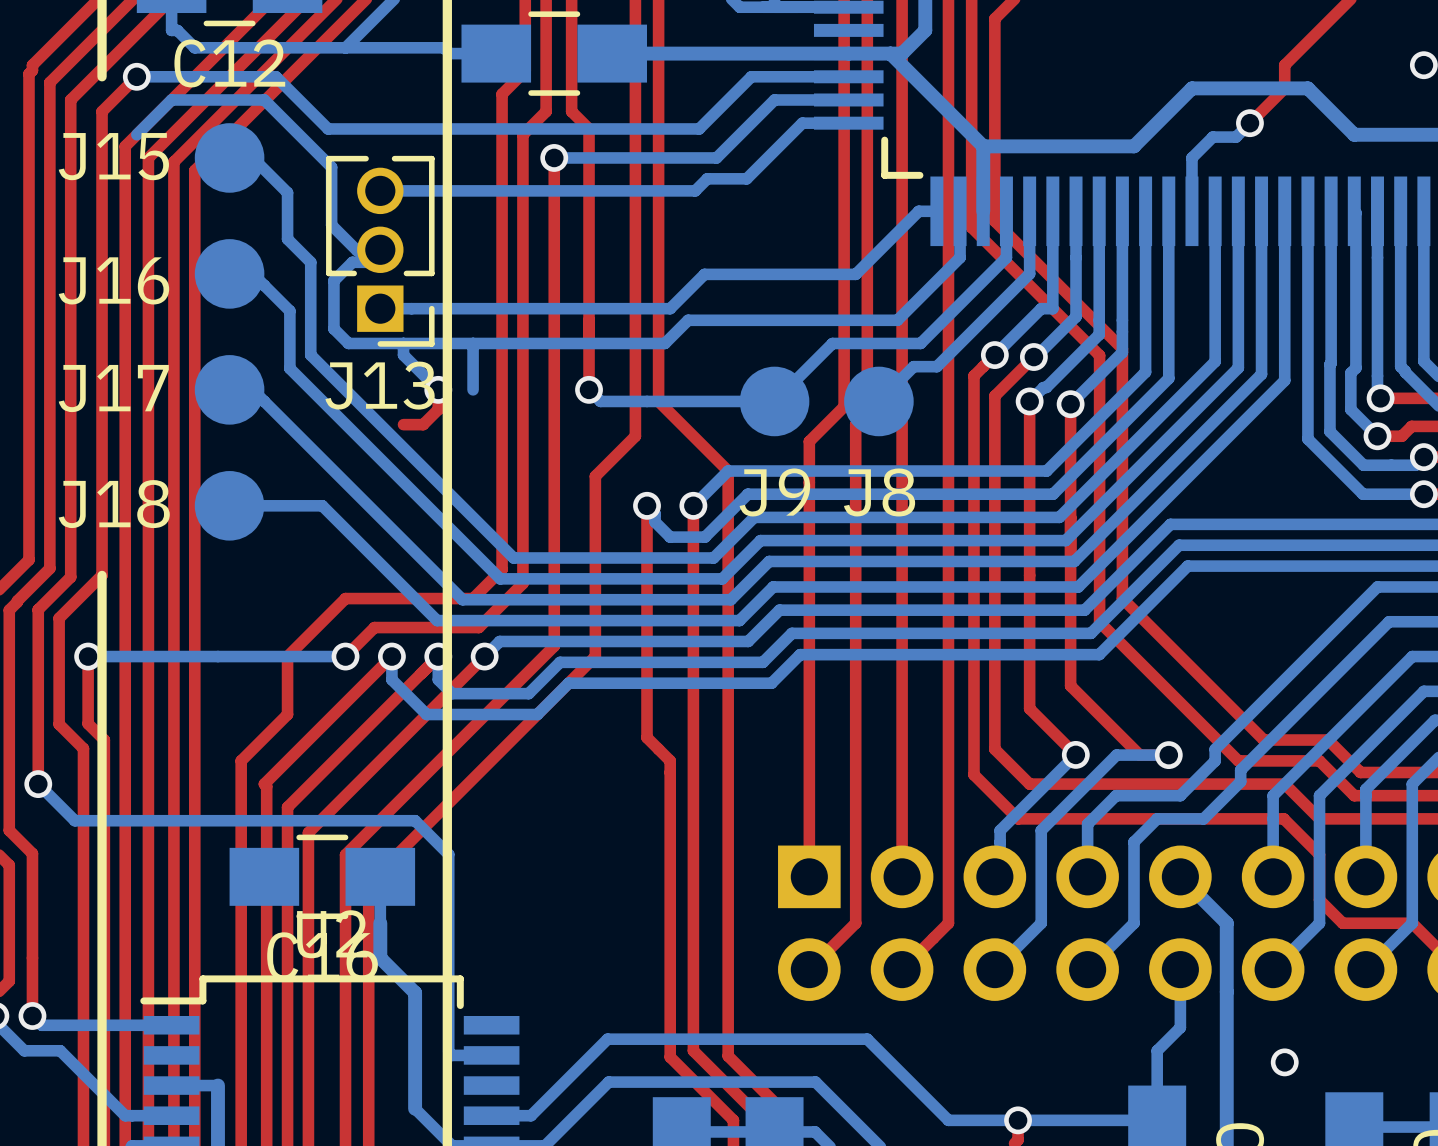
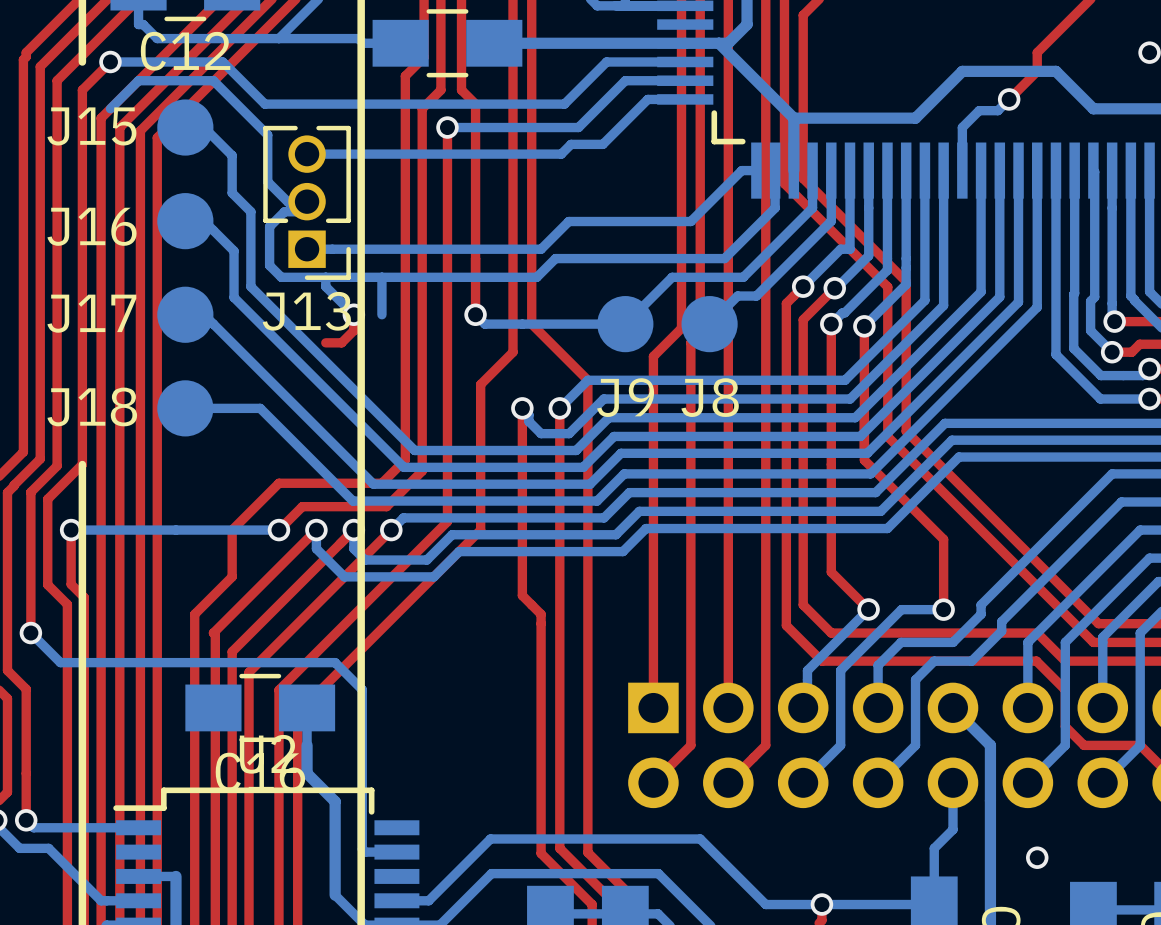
top track: (1122, 534) (1122, 598) (1263, 740) (1328, 740) -> (906, 431) (1072, 597)
top track: (1099, 540) (1099, 622) (1238, 760) (1319, 760) -> (887, 436) (1065, 614)
top track: (1070, 569) (1070, 685) (1139, 755) (1168, 755) -> (864, 460) (943, 539) (943, 609)

